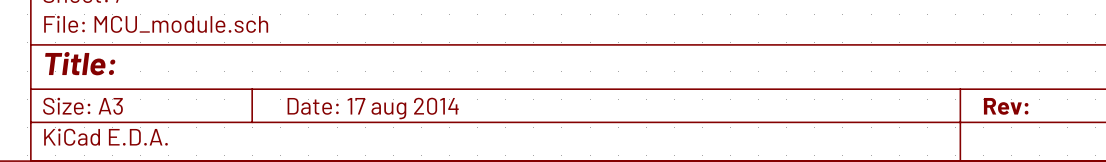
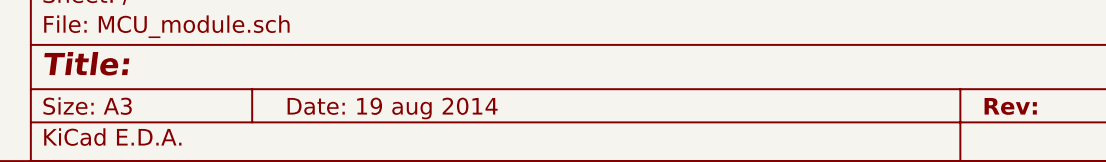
title block: Date: 17 aug 2014 (373, 108) -> Date: 19 aug 2014 (392, 108)

